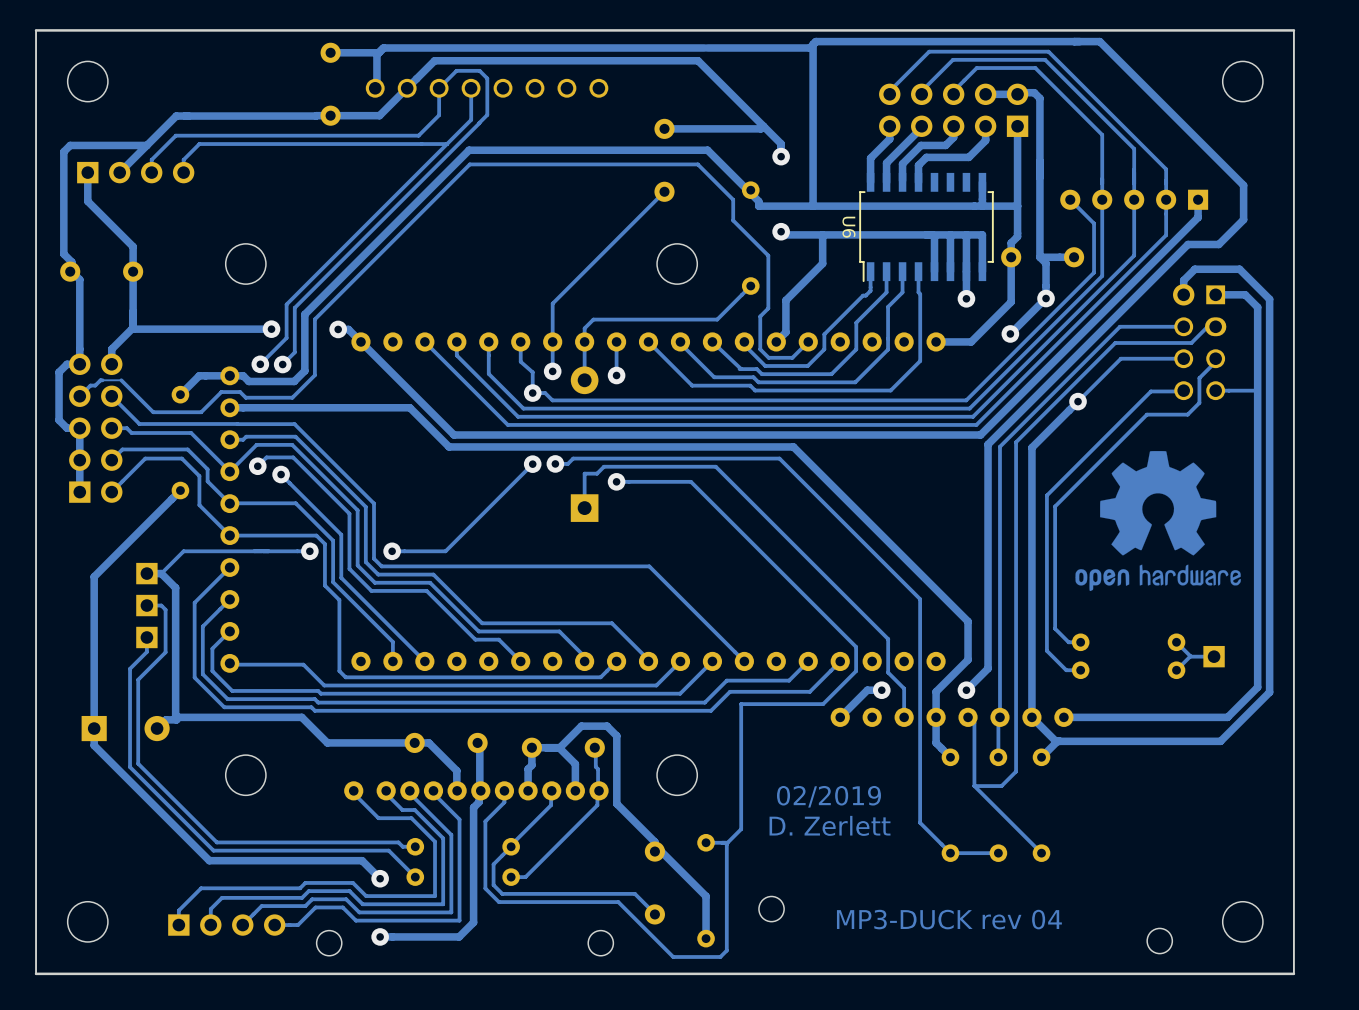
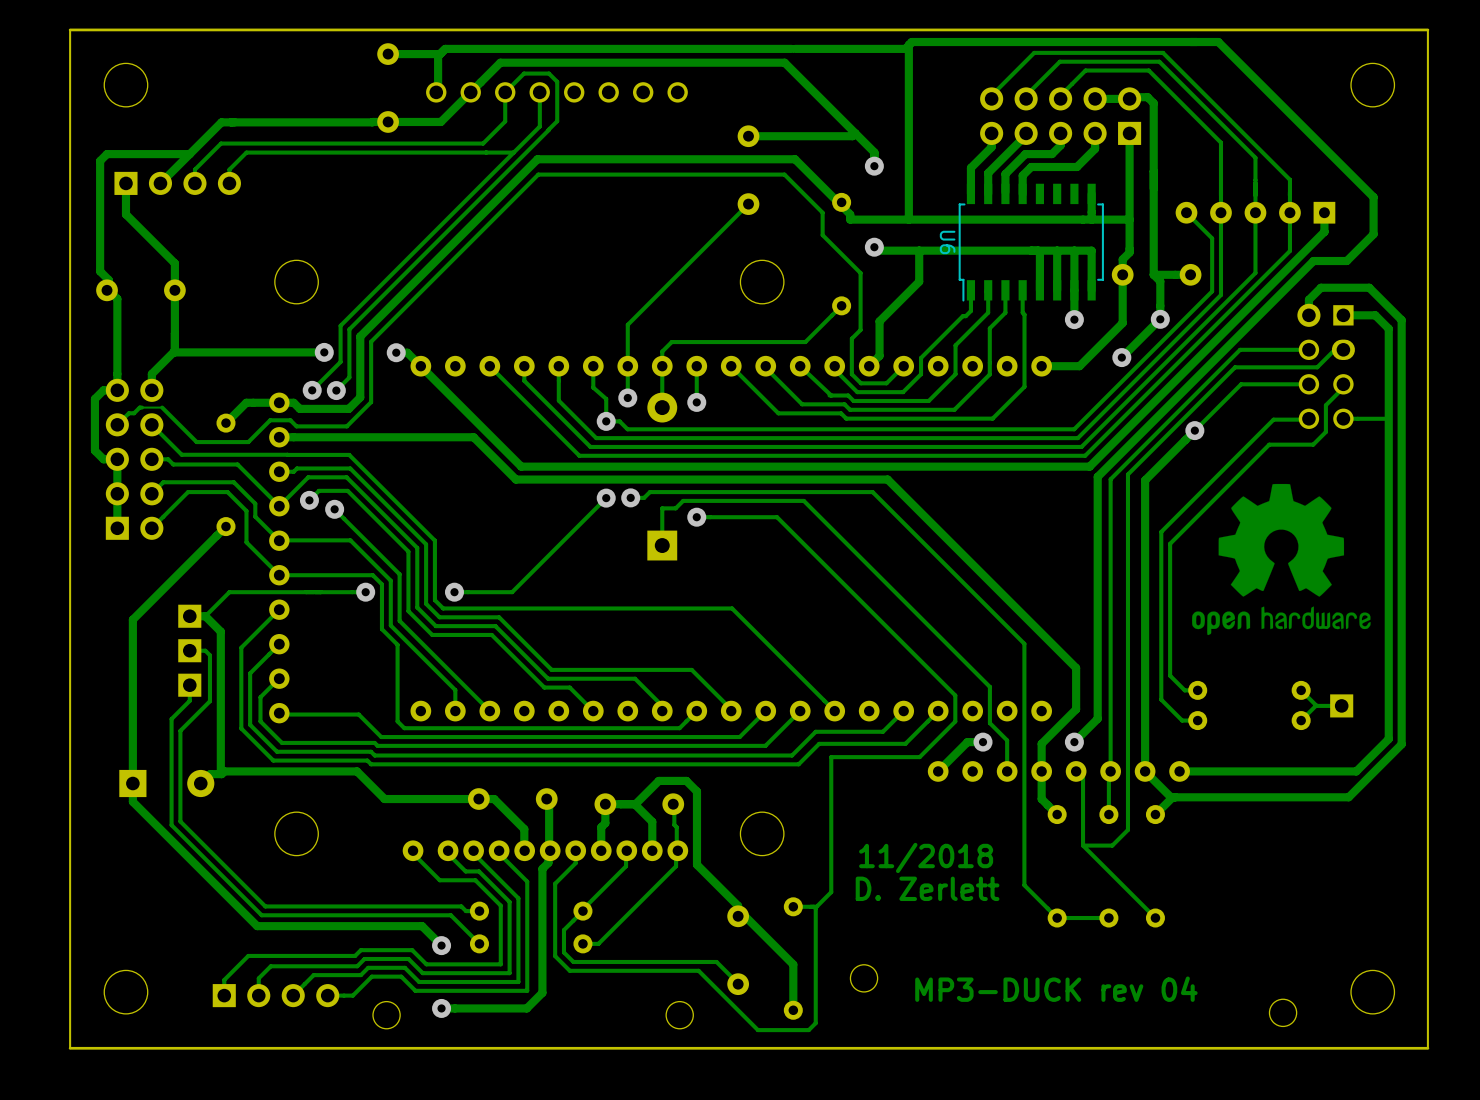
text: 02/2019 (828, 796) -> 11/2018 (926, 857)

